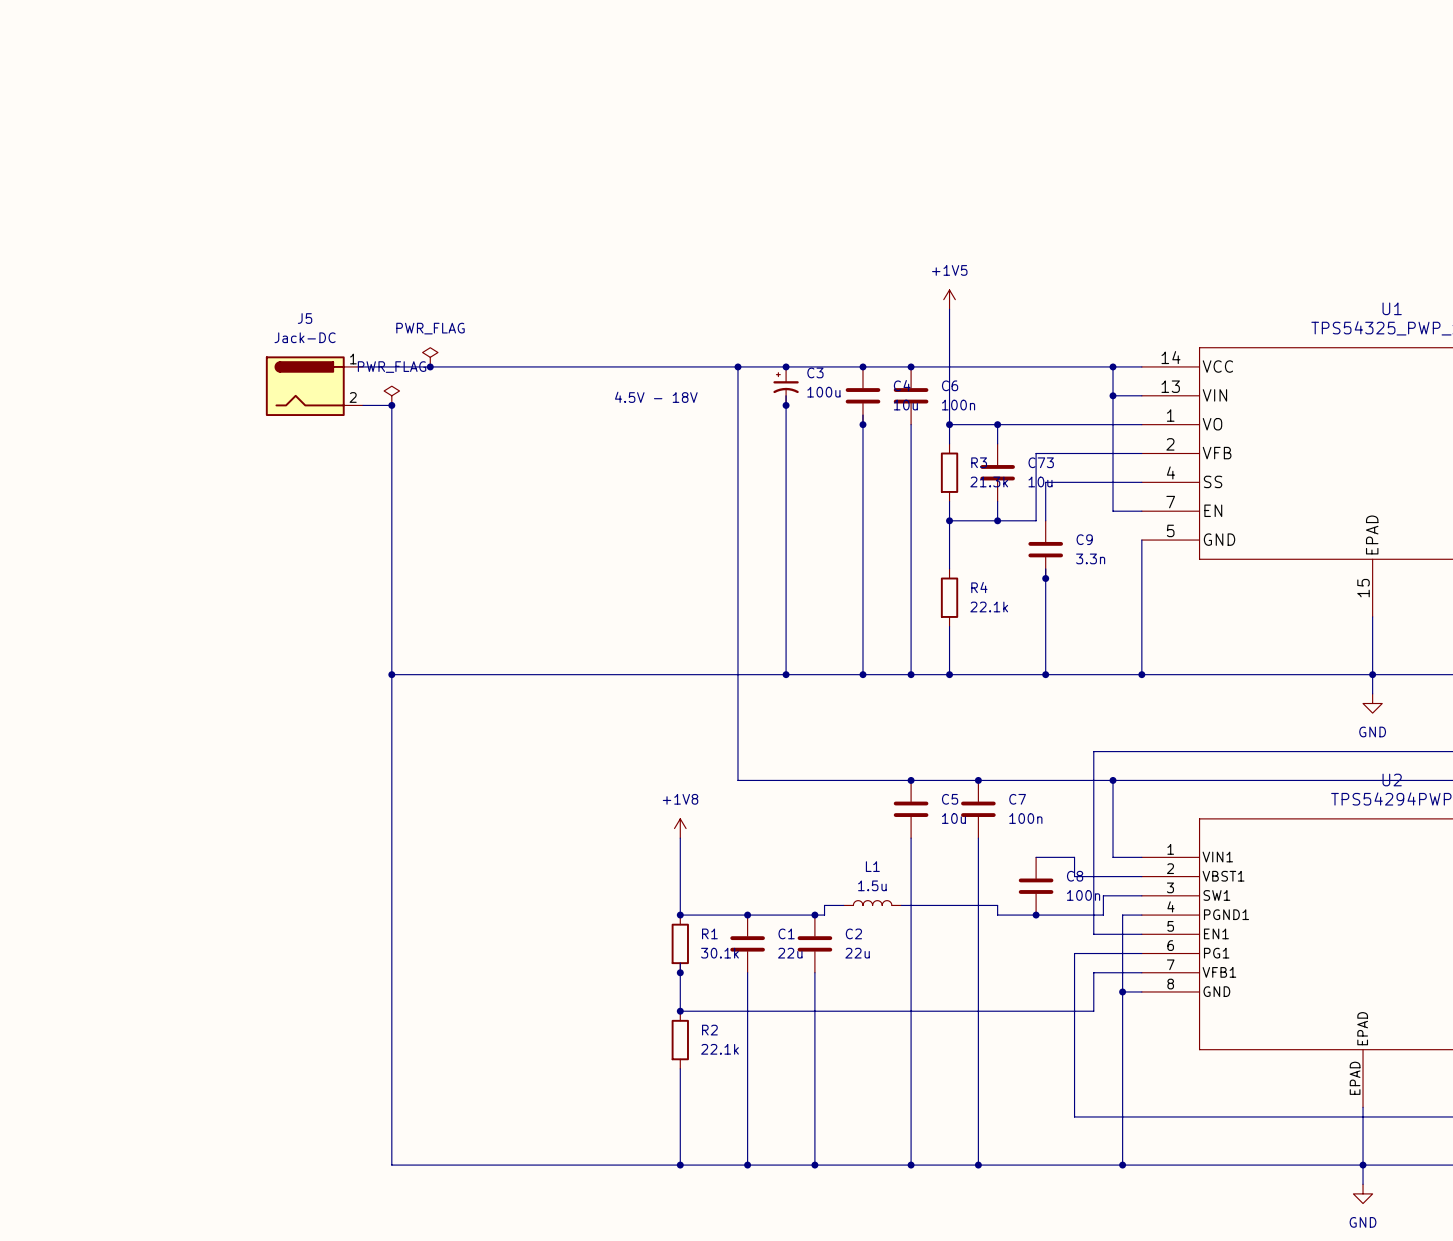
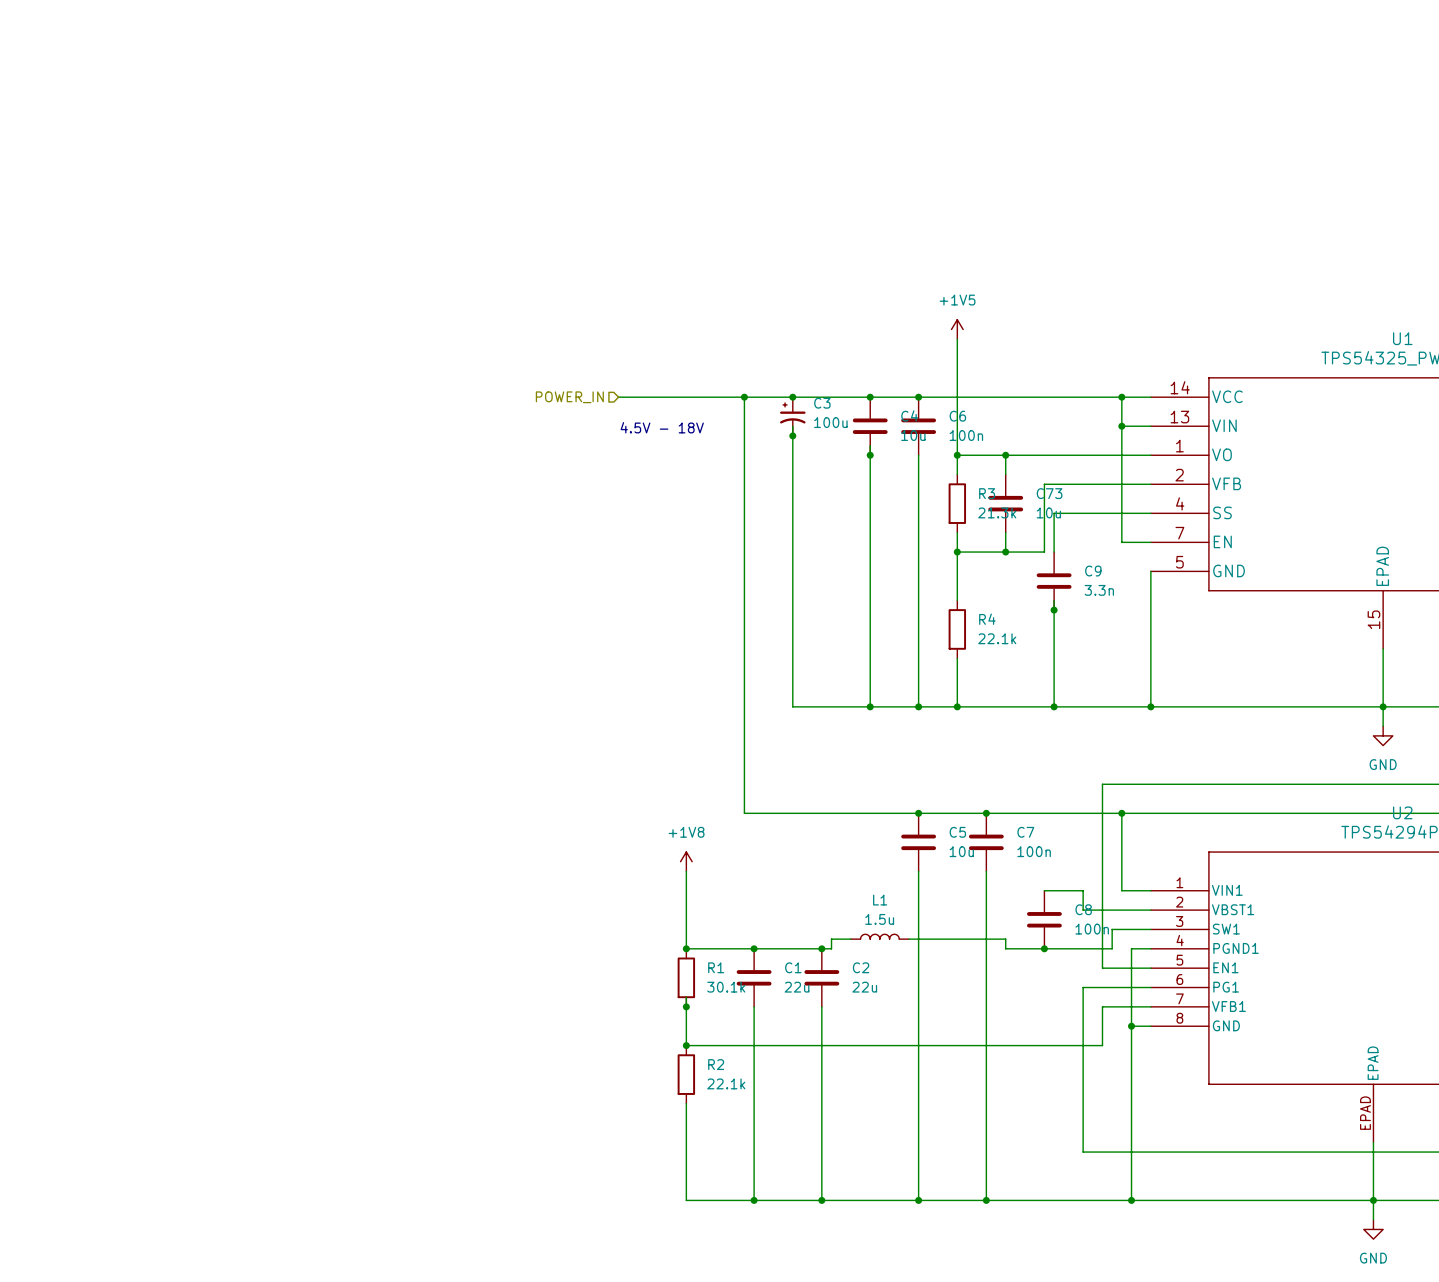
power symbol: PWR_FLAG (430, 357) -> none
wire: (362, 366) (612, 366) -> none
junction: (430, 366) -> none
hierarchical label: none -> POWER_IN (569, 397)
J5: Jack-DC (314, 386) -> none
power symbol: PWR_FLAG (391, 395) -> none
wire: (362, 405) (391, 405) (391, 1165) (680, 1165) -> none
junction: (391, 405) -> none
wire: (391, 674) (786, 674) -> none
junction: (391, 674) -> none
junction: (786, 674) -> none
junction: (680, 1165) -> none

